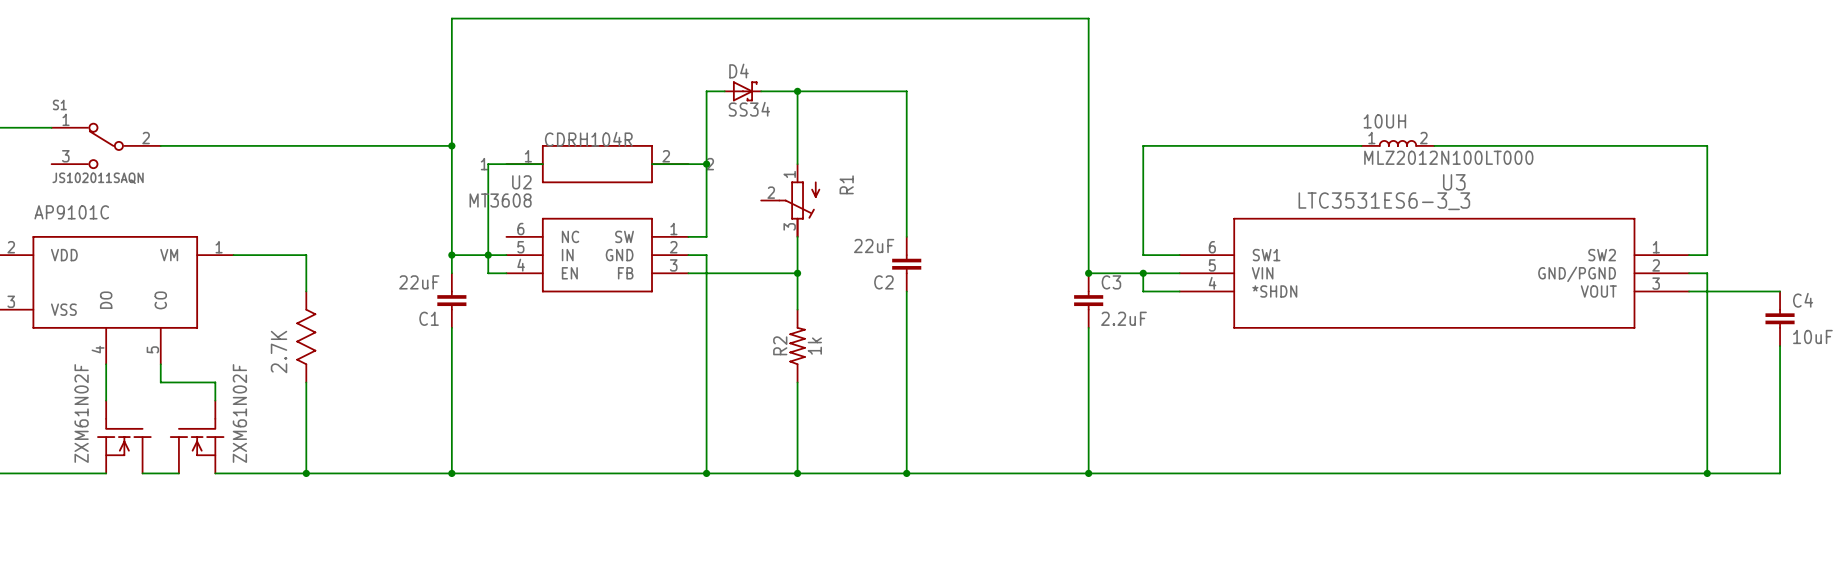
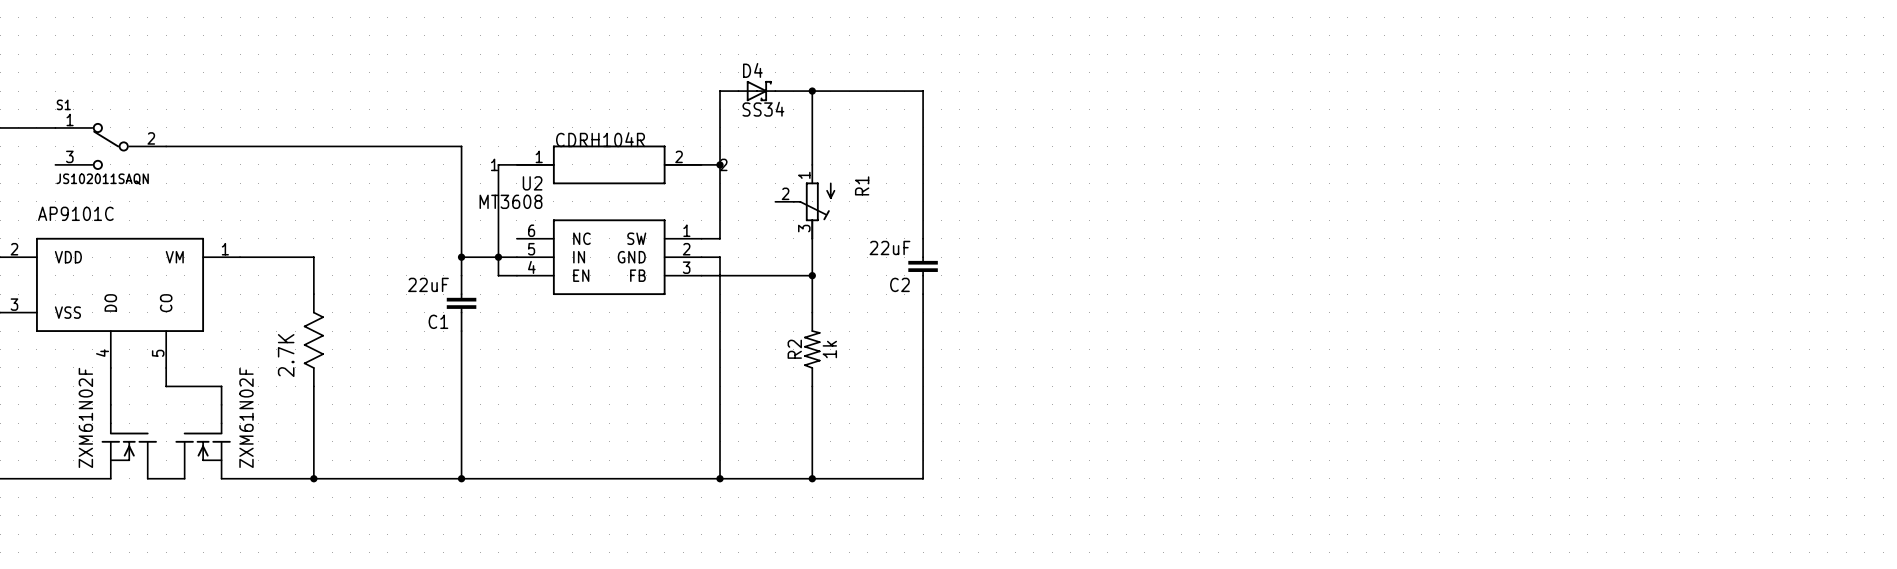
10UH: MLZ2012N100LT000 (1397, 143) -> none
wire: (451, 145) (451, 18) (1088, 18) (1088, 273) (1179, 273) -> none
junction: (451, 145) -> none
wire: (1361, 145) (1143, 145) (1143, 255) (1179, 255) -> none
wire: (1434, 145) (1707, 145) (1707, 255) (1689, 255) -> none
junction: (1088, 273) -> none
wire: (1143, 273) (1143, 291) (1179, 291) -> none
junction: (1143, 273) -> none
U3: LTC3531ES6-3_3 (1434, 273) -> none
wire: (1689, 273) (1707, 273) (1707, 473) -> none
wire: (1689, 291) (1780, 291) -> none
C3: 2.2uF (1088, 300) -> none
C4: 10uF (1780, 318) -> none
wire: (1088, 327) (1088, 473) -> none
wire: (1780, 346) (1780, 473) (906, 473) -> none
junction: (906, 473) -> none
junction: (1088, 473) -> none
junction: (1707, 473) -> none

